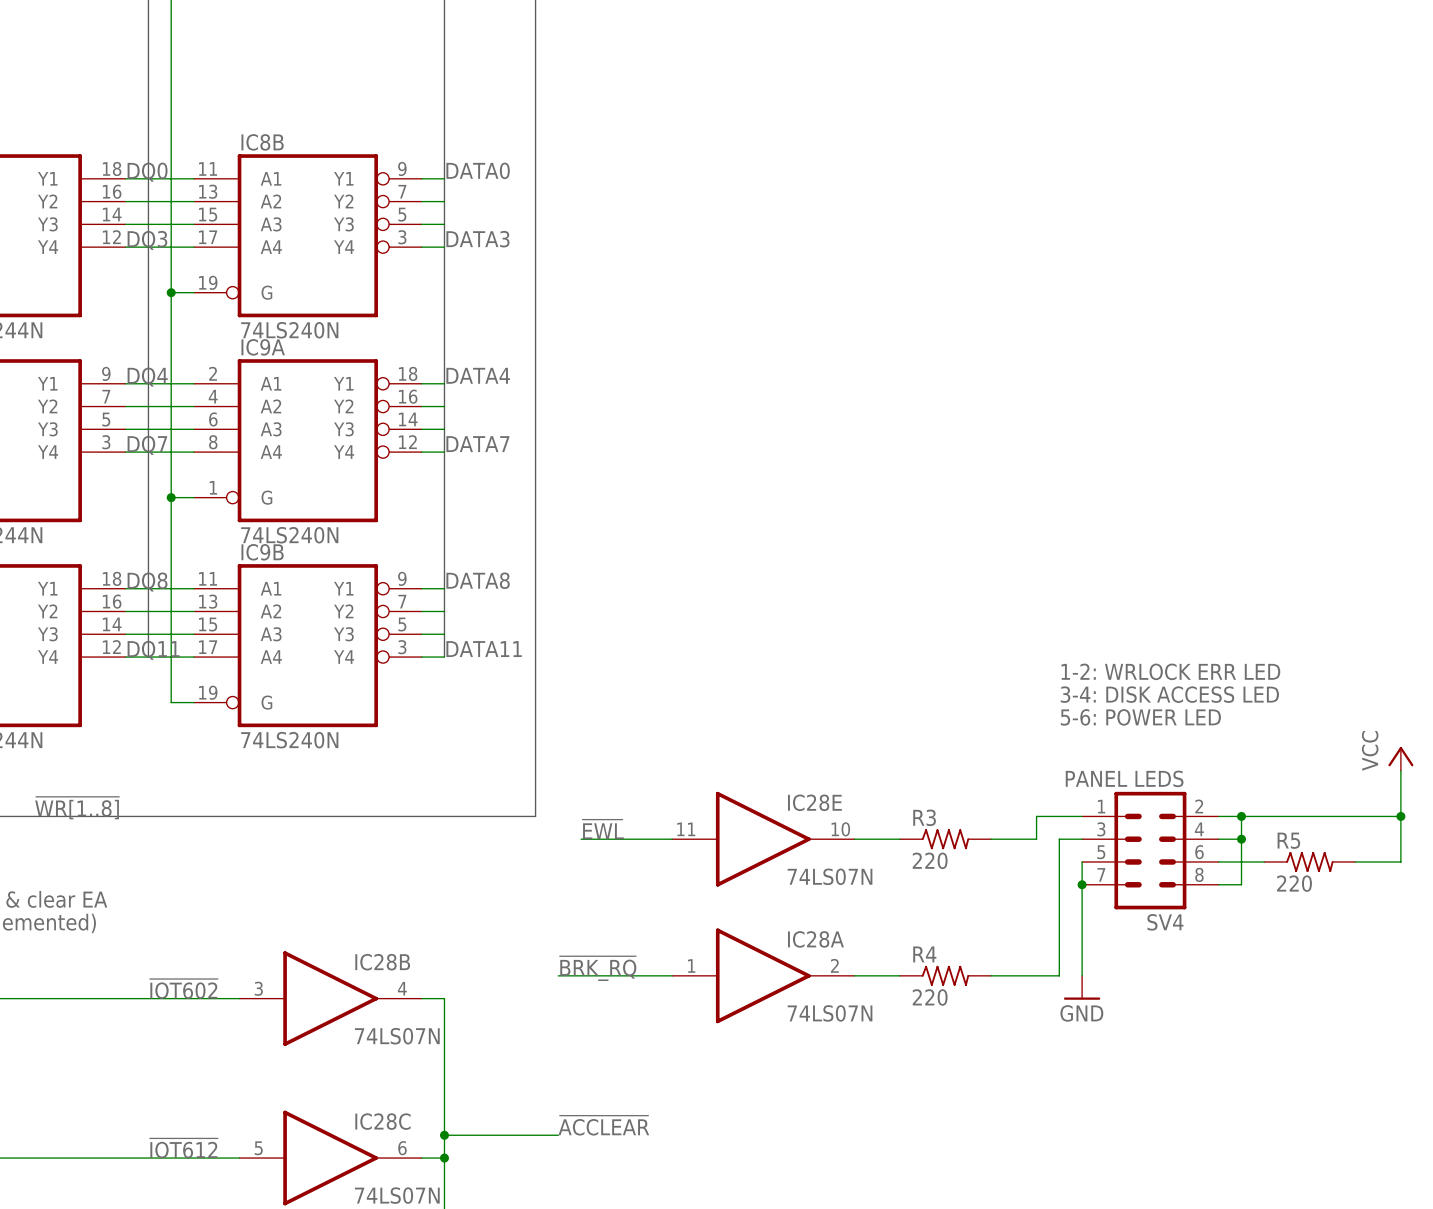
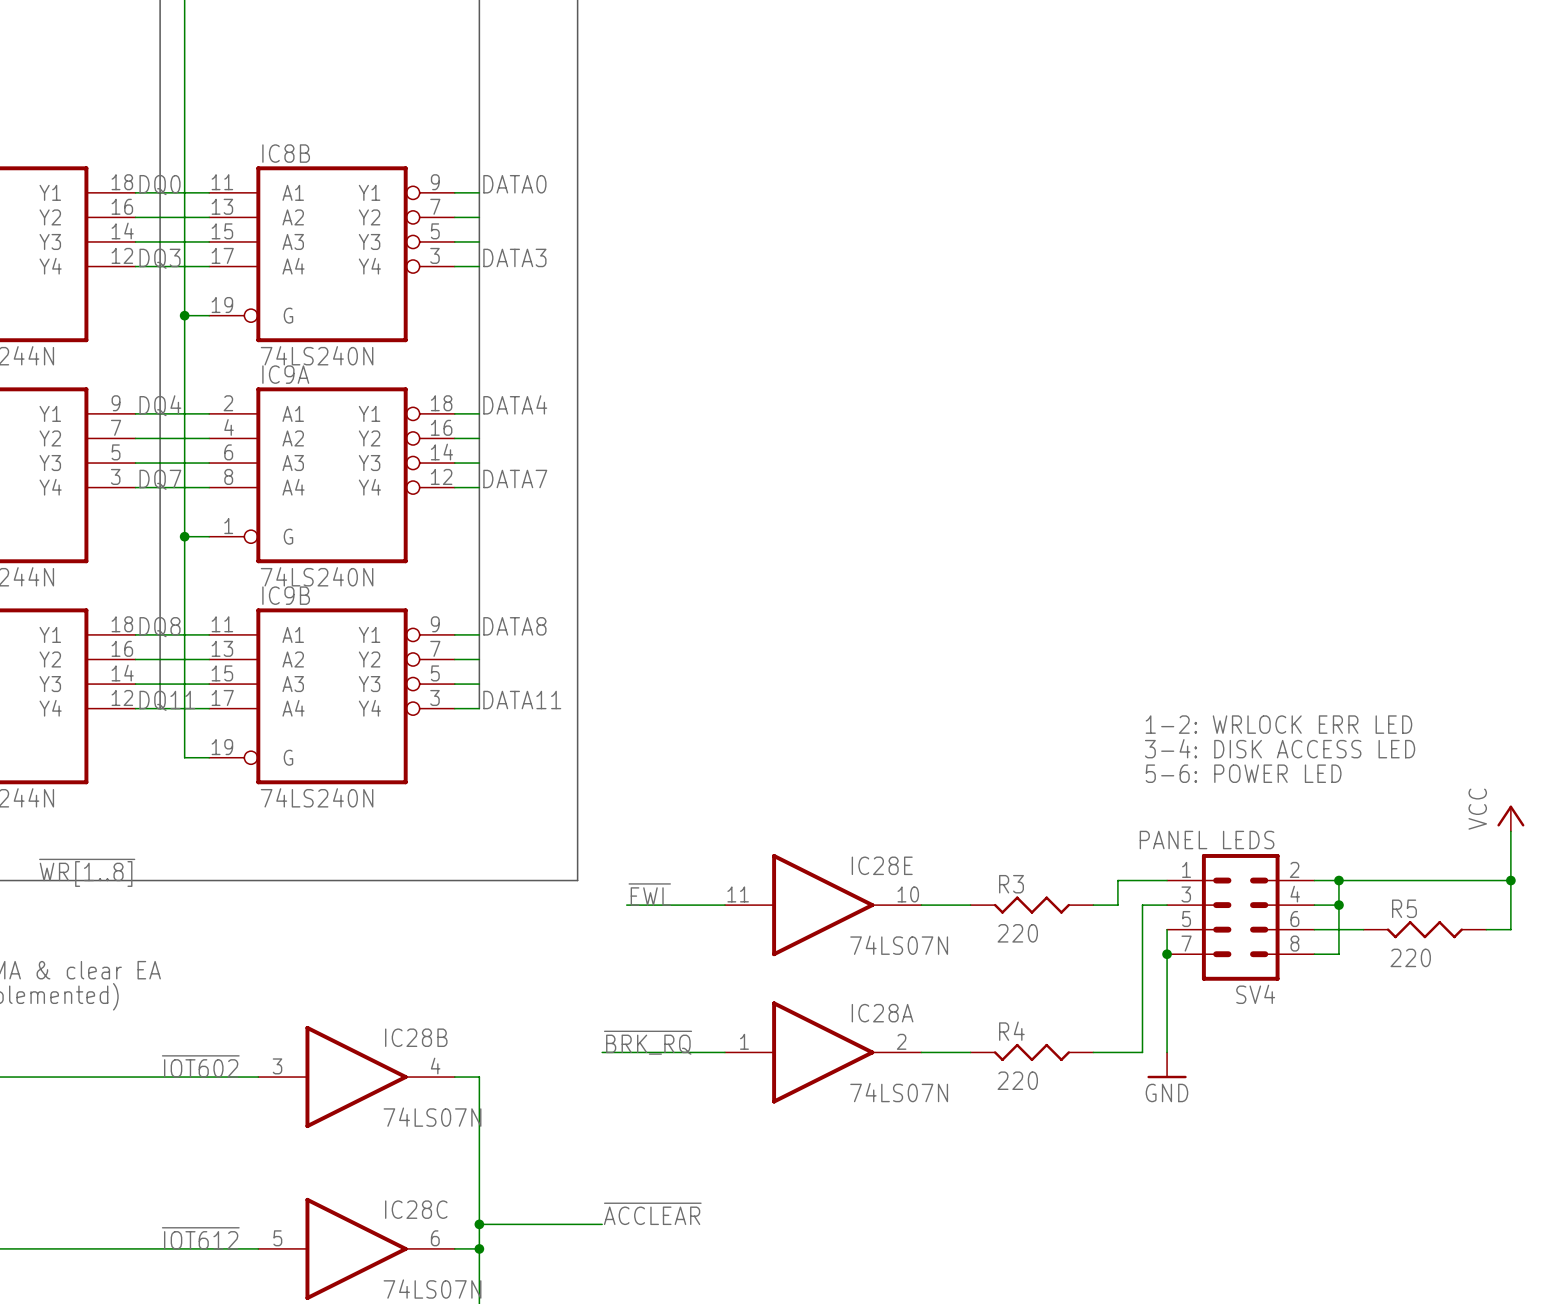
R3 symbol: [899, 829, 992, 850] -> [970, 896, 1094, 914]
R5 symbol: [1264, 851, 1356, 873] -> [1363, 921, 1487, 939]
R4 symbol: [899, 965, 992, 986] -> [970, 1043, 1094, 1062]

